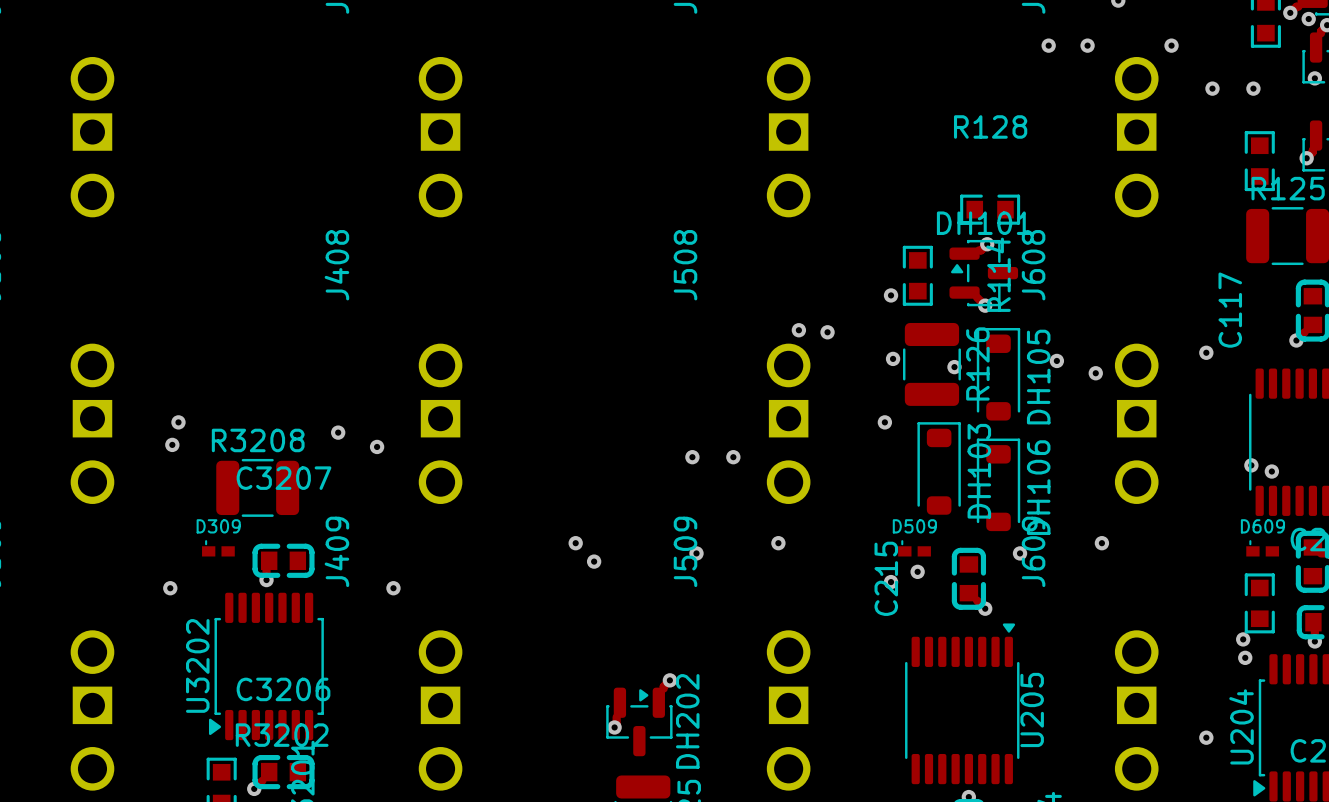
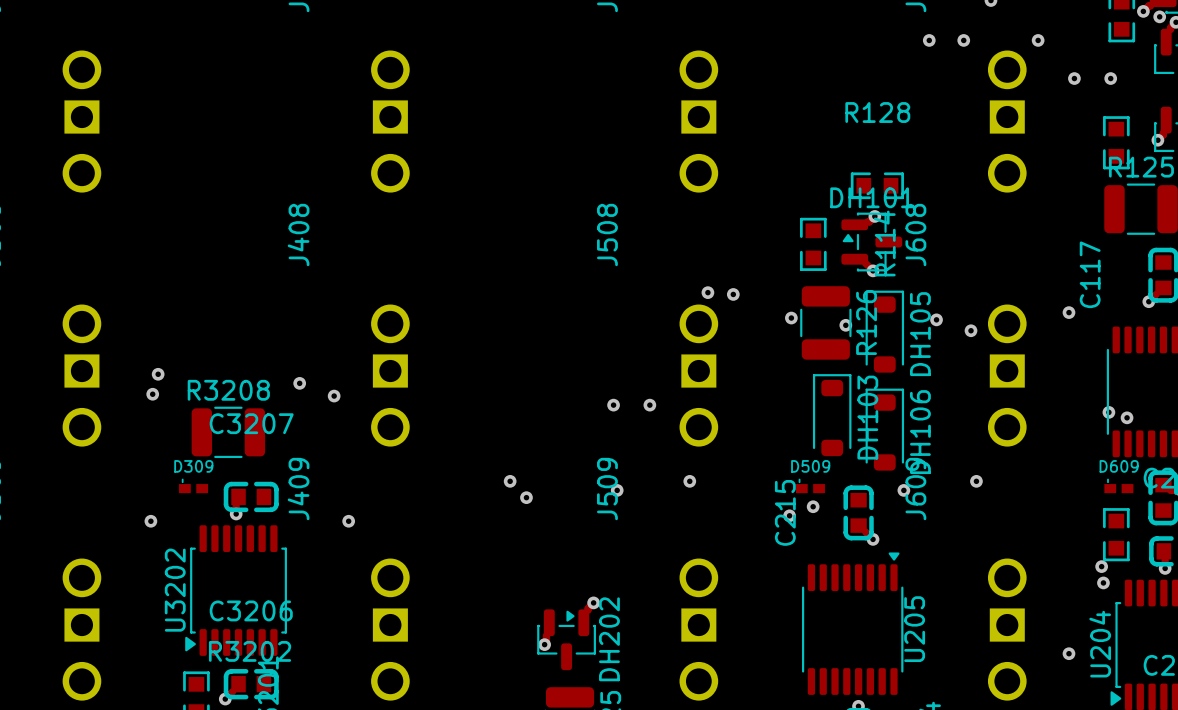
via: (1314, 78) -> none
via: (891, 295) -> none
via: (884, 422) -> none

